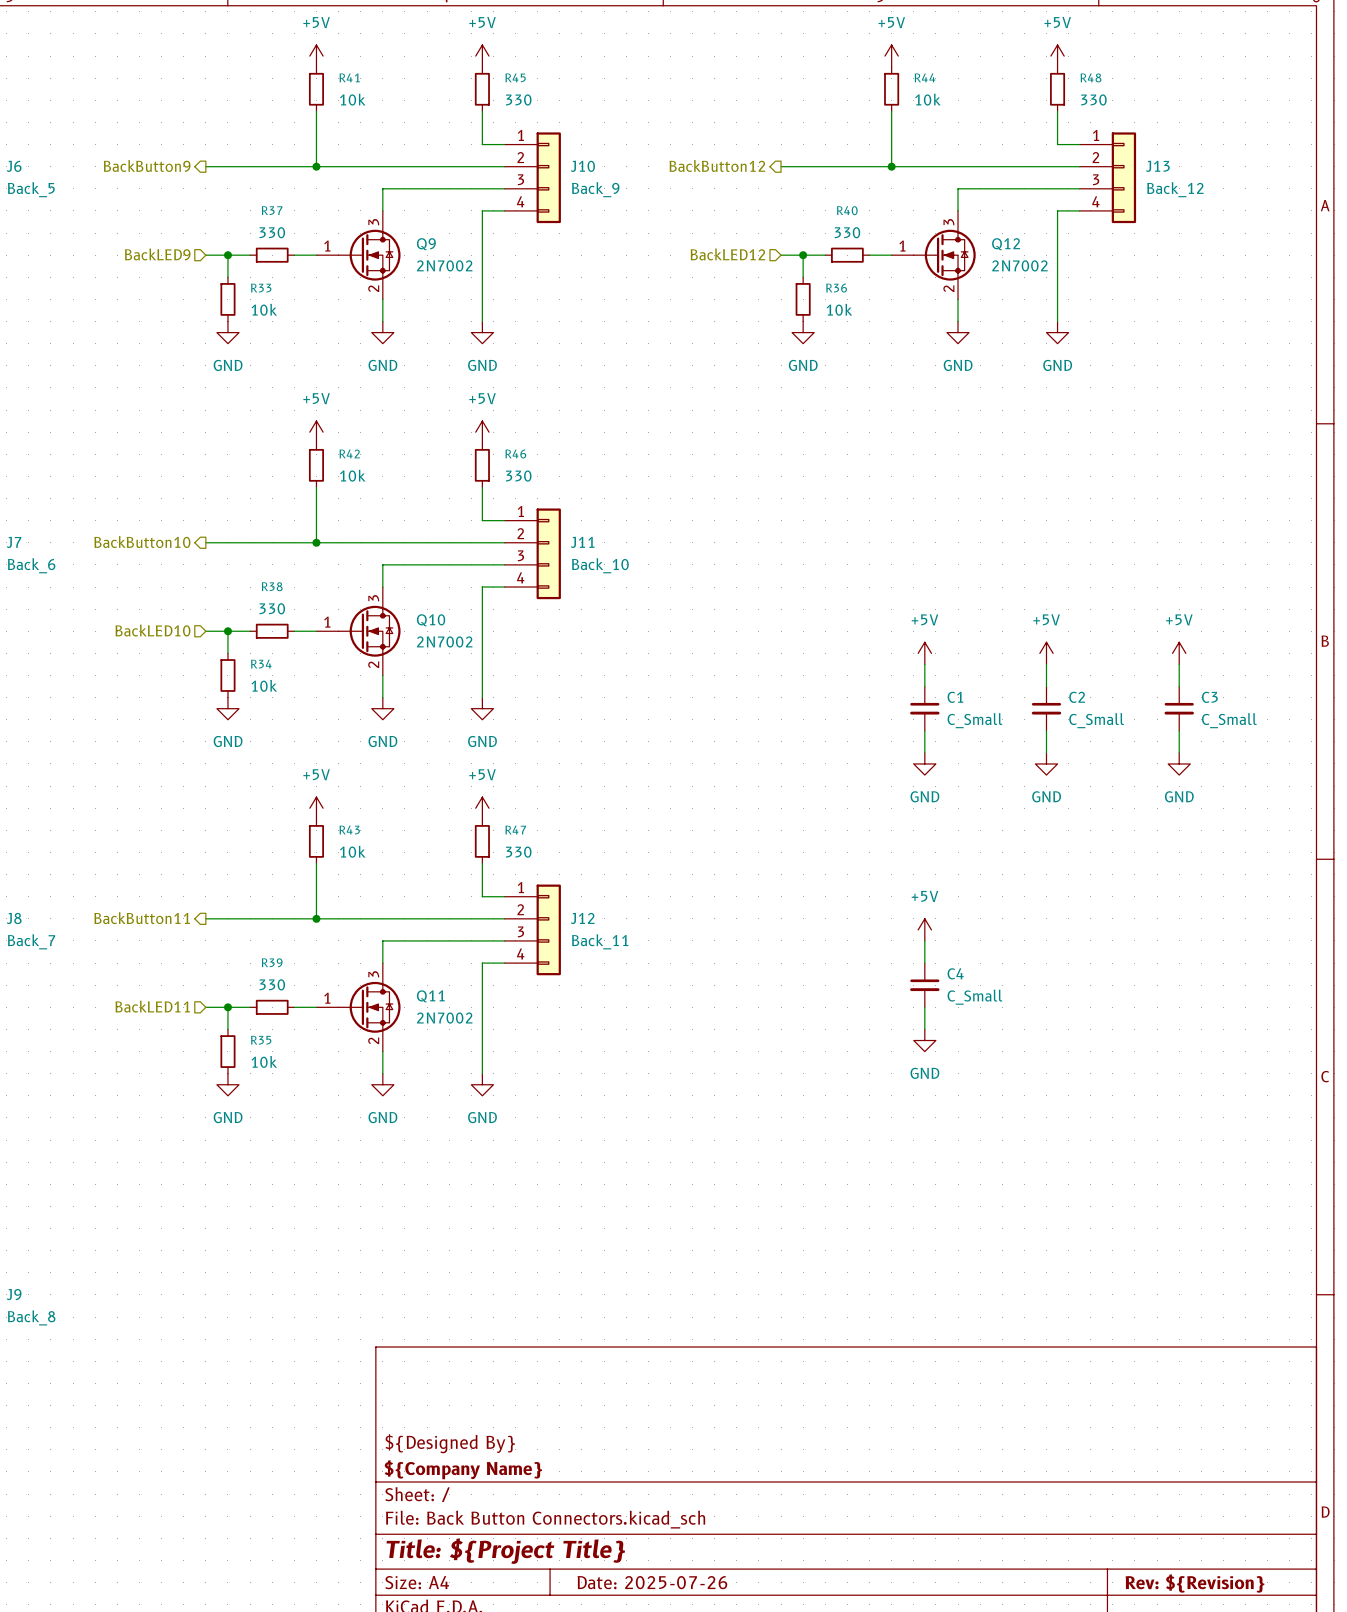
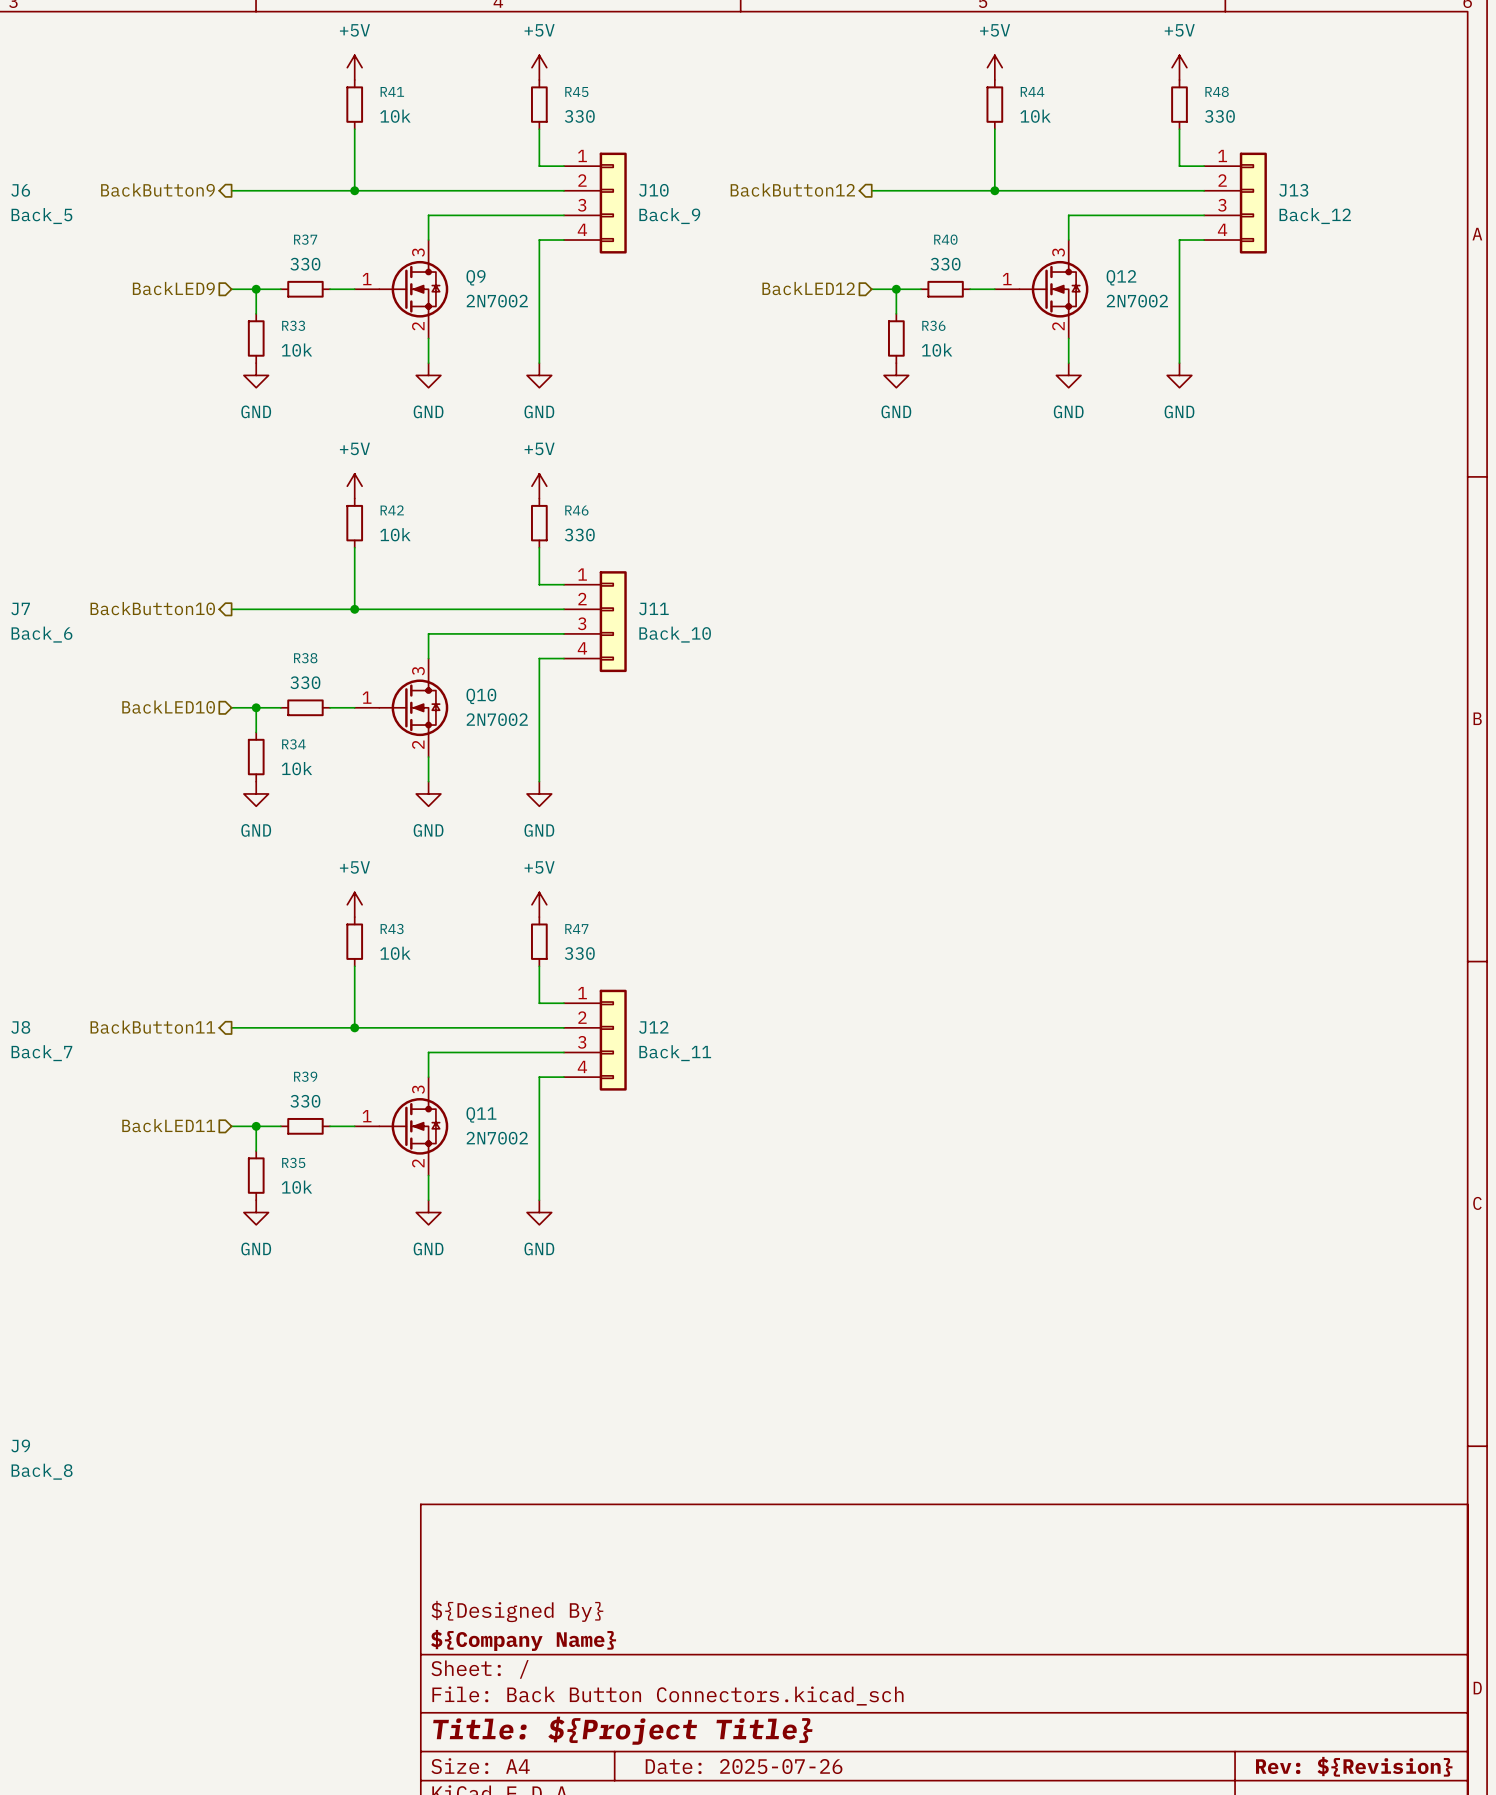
power symbol: +5V (924, 653) -> none
power symbol: +5V (1046, 653) -> none
power symbol: +5V (1179, 653) -> none
wire: (924, 664) (924, 686) -> none
wire: (1046, 664) (1046, 686) -> none
wire: (1179, 664) (1179, 686) -> none
C1: C_Small (924, 708) -> none
C2: C_Small (1046, 708) -> none
C3: C_Small (1179, 708) -> none
wire: (924, 730) (924, 752) -> none
wire: (1046, 730) (1046, 752) -> none
wire: (1179, 730) (1179, 752) -> none
power symbol: GND (924, 763) -> none
power symbol: GND (1046, 763) -> none
power symbol: GND (1179, 763) -> none
power symbol: +5V (924, 929) -> none
wire: (924, 940) (924, 963) -> none
C4: C_Small (924, 985) -> none
wire: (924, 1007) (924, 1029) -> none
power symbol: GND (924, 1040) -> none

